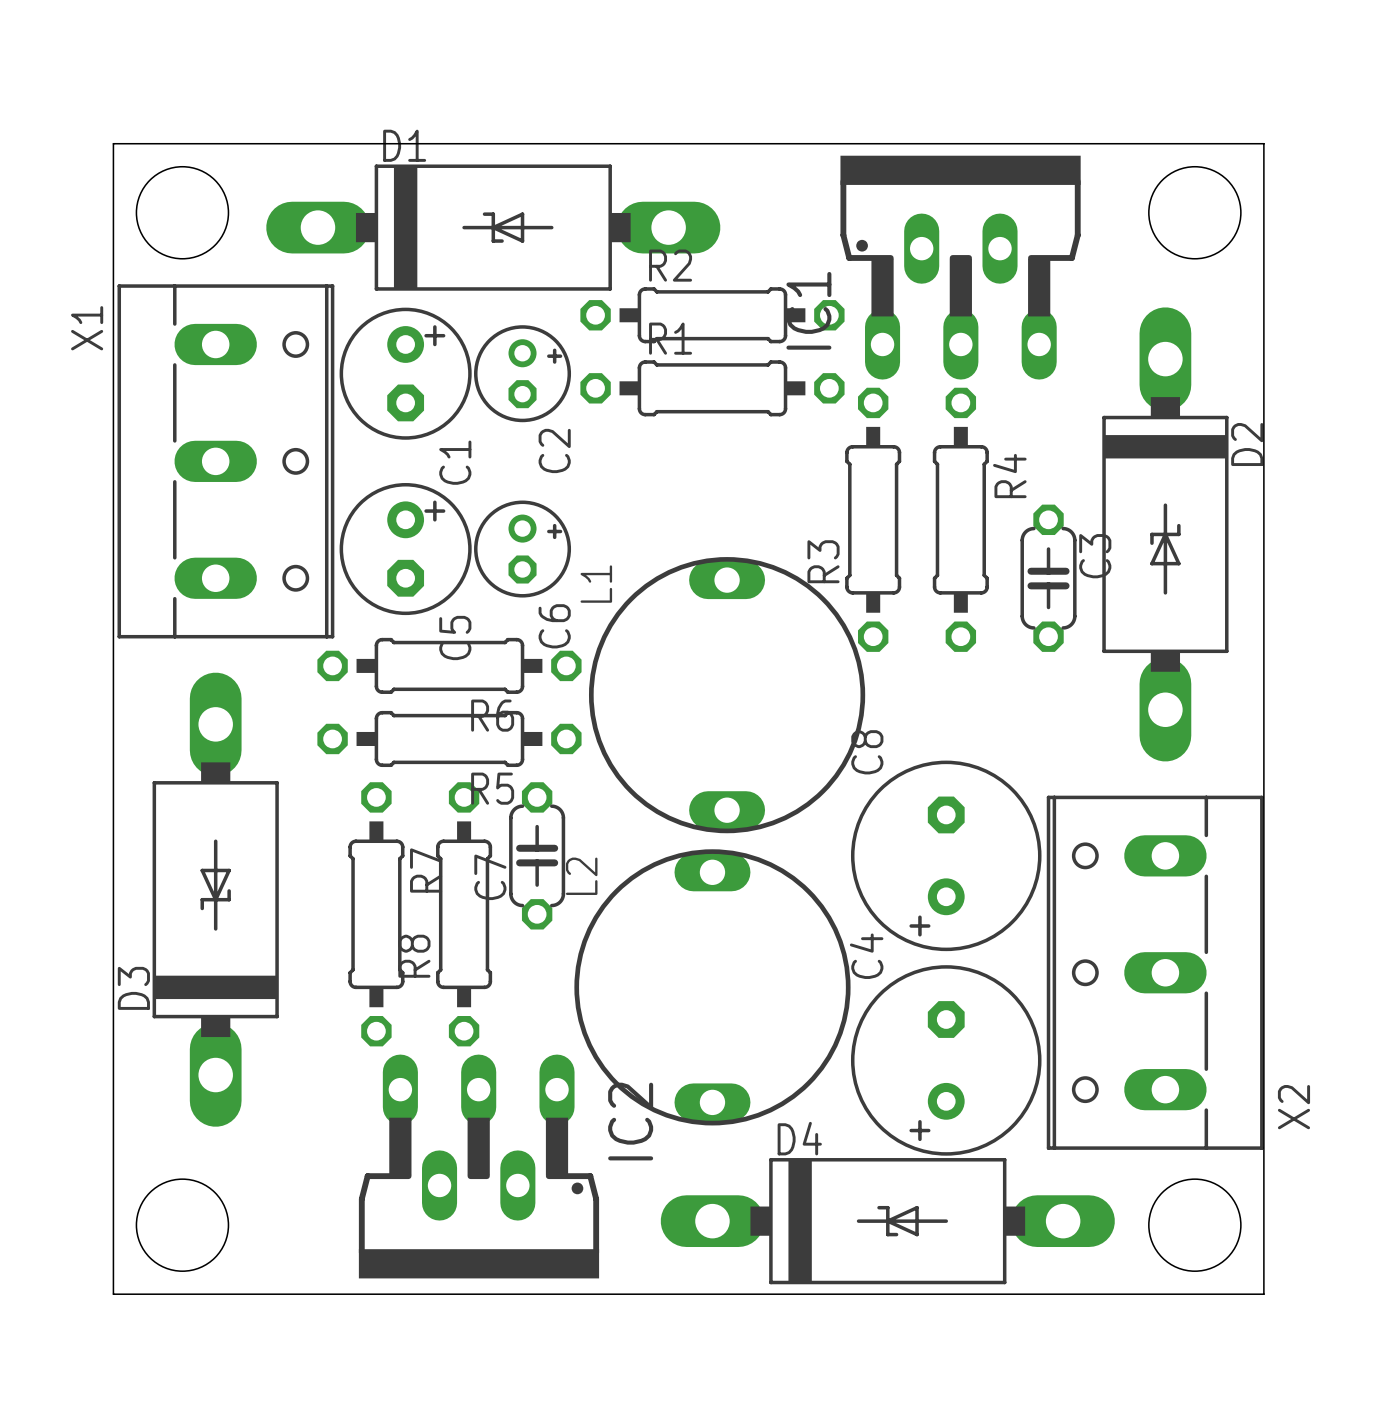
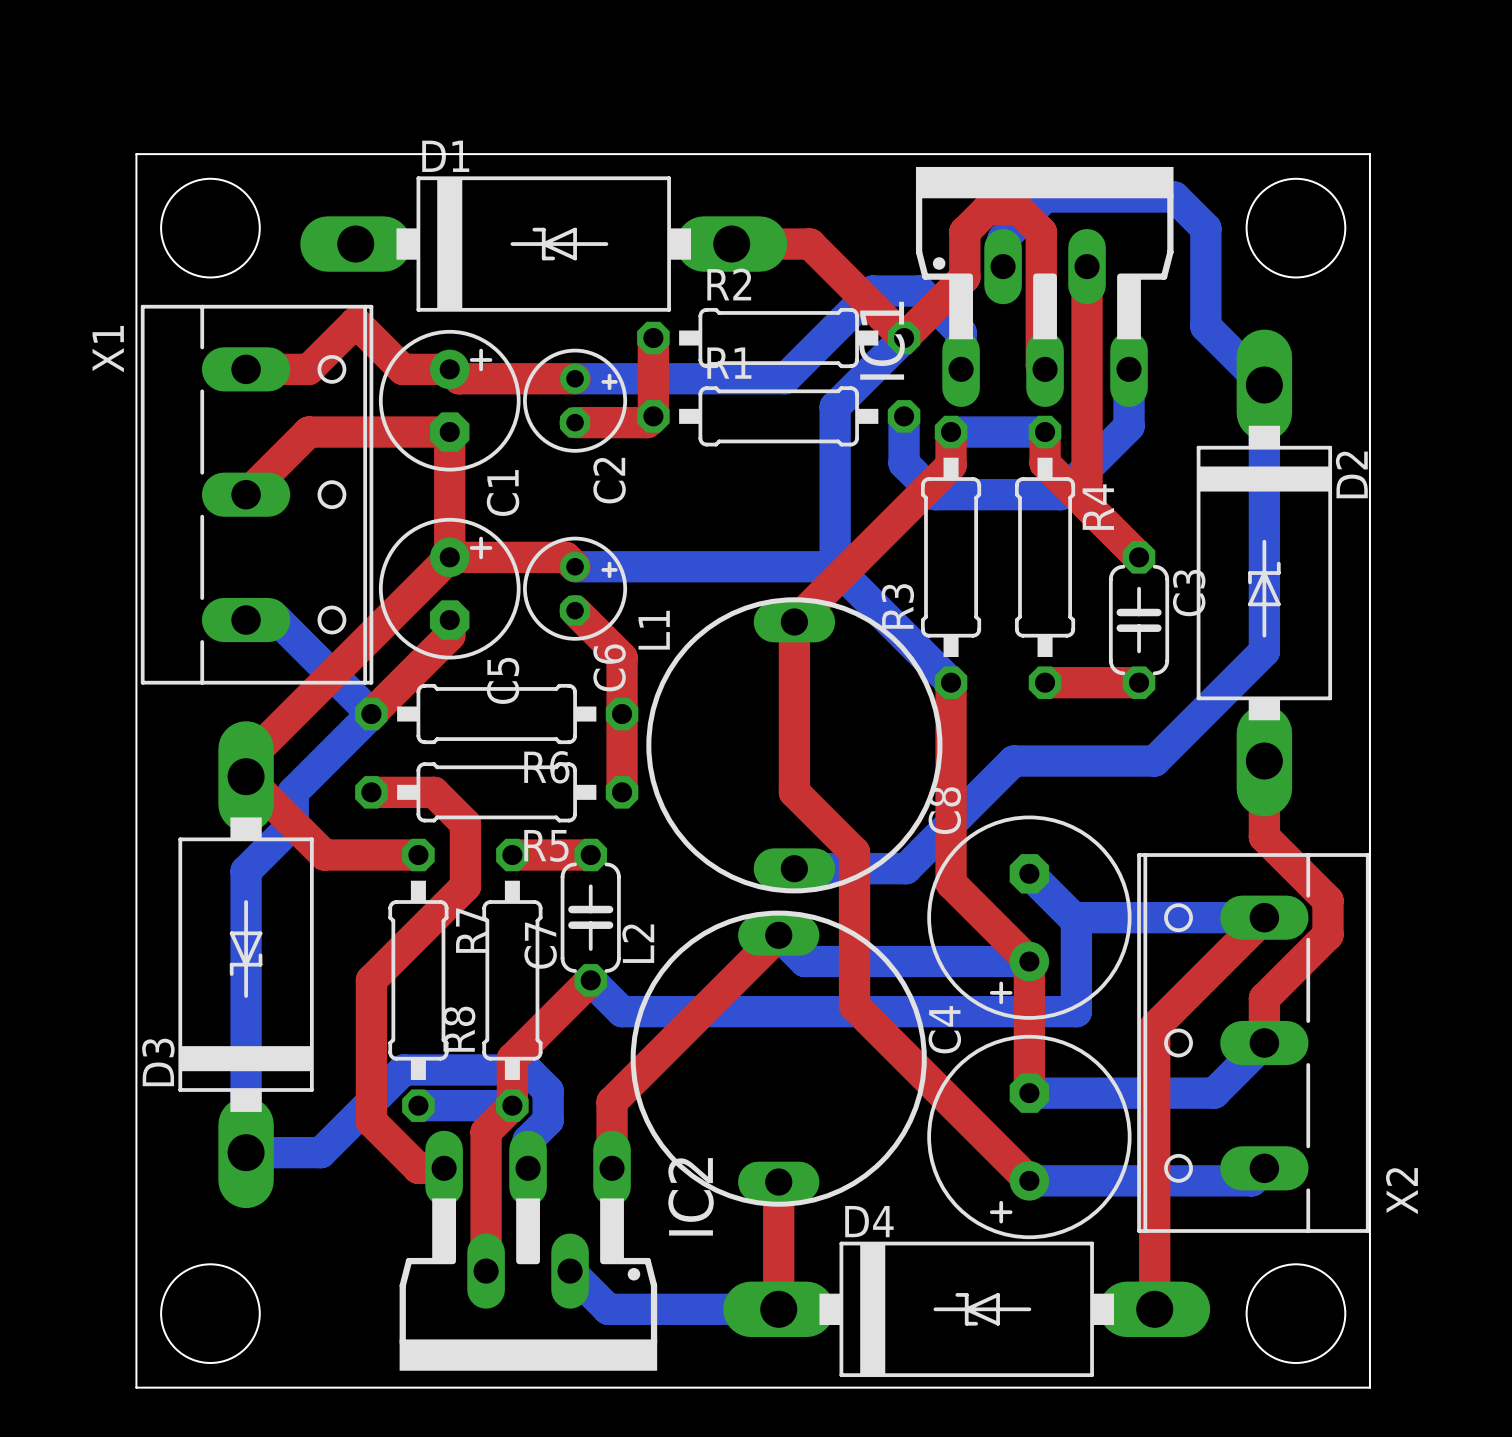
top track: none -> (731, 244) (810, 244) (904, 338) (964, 277) (964, 231) (987, 209) (1018, 209) (1041, 231) (1041, 365) (1045, 369)
bottom track: none -> (1003, 266) (1003, 239) (1045, 197) (1174, 197) (1205, 228) (1205, 326) (1264, 385) (1264, 651) (1154, 761) (1013, 761) (906, 868) (794, 868)
top track: none -> (1087, 266) (1087, 505)
top track: none -> (653, 338) (653, 416) (647, 422) (575, 422)
bottom track: none -> (904, 338) (835, 406) (835, 566)
top track: none -> (246, 369) (308, 369) (355, 322) (402, 369) (449, 369) (459, 378) (575, 378)
bottom track: none -> (961, 369) (961, 332) (919, 291) (872, 291) (785, 378) (575, 378)
bottom track: none -> (1129, 369) (1129, 426) (1060, 494) (935, 494) (904, 463) (904, 416)
top track: none -> (951, 432) (951, 465) (794, 622) (794, 792) (854, 852) (854, 1006) (1029, 1180)
bottom track: none -> (951, 432) (1045, 432)
top track: none -> (1045, 432) (1045, 463) (1139, 557)
top track: none -> (246, 494) (308, 432) (449, 432) (449, 557)
top track: none -> (449, 557) (565, 557) (575, 566)
top track: none -> (449, 557) (246, 761) (246, 776) (324, 855) (418, 855)
bottom track: none -> (575, 566) (835, 566)
bottom track: none -> (835, 566) (951, 682)
top track: none -> (575, 610) (622, 657) (622, 792)
bottom track: none -> (246, 620) (277, 620) (371, 714) (293, 792) (293, 823) (246, 871) (246, 1152) (320, 1152) (403, 1069) (527, 1069) (548, 1090) (548, 1120) (528, 1140) (528, 1168)
top track: none -> (449, 620) (449, 635) (371, 714)
top track: none -> (951, 682) (951, 883) (1029, 961) (1029, 1093)
top track: none -> (1045, 682) (1139, 682)
top track: none -> (1264, 761) (1264, 836) (1327, 900) (1327, 934) (1264, 998) (1264, 1043)
top track: none -> (371, 792) (434, 792) (465, 823) (465, 886) (371, 980) (371, 1121) (418, 1168) (444, 1168)
top track: none -> (512, 855) (590, 855)
bottom track: none -> (1029, 873) (1076, 920) (1076, 1011) (622, 1011) (590, 980)
bottom track: none -> (1073, 917) (1264, 917)
top track: none -> (1264, 917) (1154, 1027) (1154, 1309)
top track: none -> (778, 935) (612, 1102) (612, 1168)
bottom track: none -> (778, 935) (804, 961) (1029, 961)
top track: none -> (590, 980) (512, 1058) (512, 1105) (486, 1131) (486, 1271)
bottom track: none -> (1264, 1043) (1214, 1093) (1029, 1093)
bottom track: none -> (418, 1105) (512, 1105)
bottom track: none -> (1264, 1168) (1251, 1180) (1029, 1180)
top track: none -> (778, 1182) (778, 1309)
bottom track: none -> (570, 1271) (608, 1309) (778, 1309)

